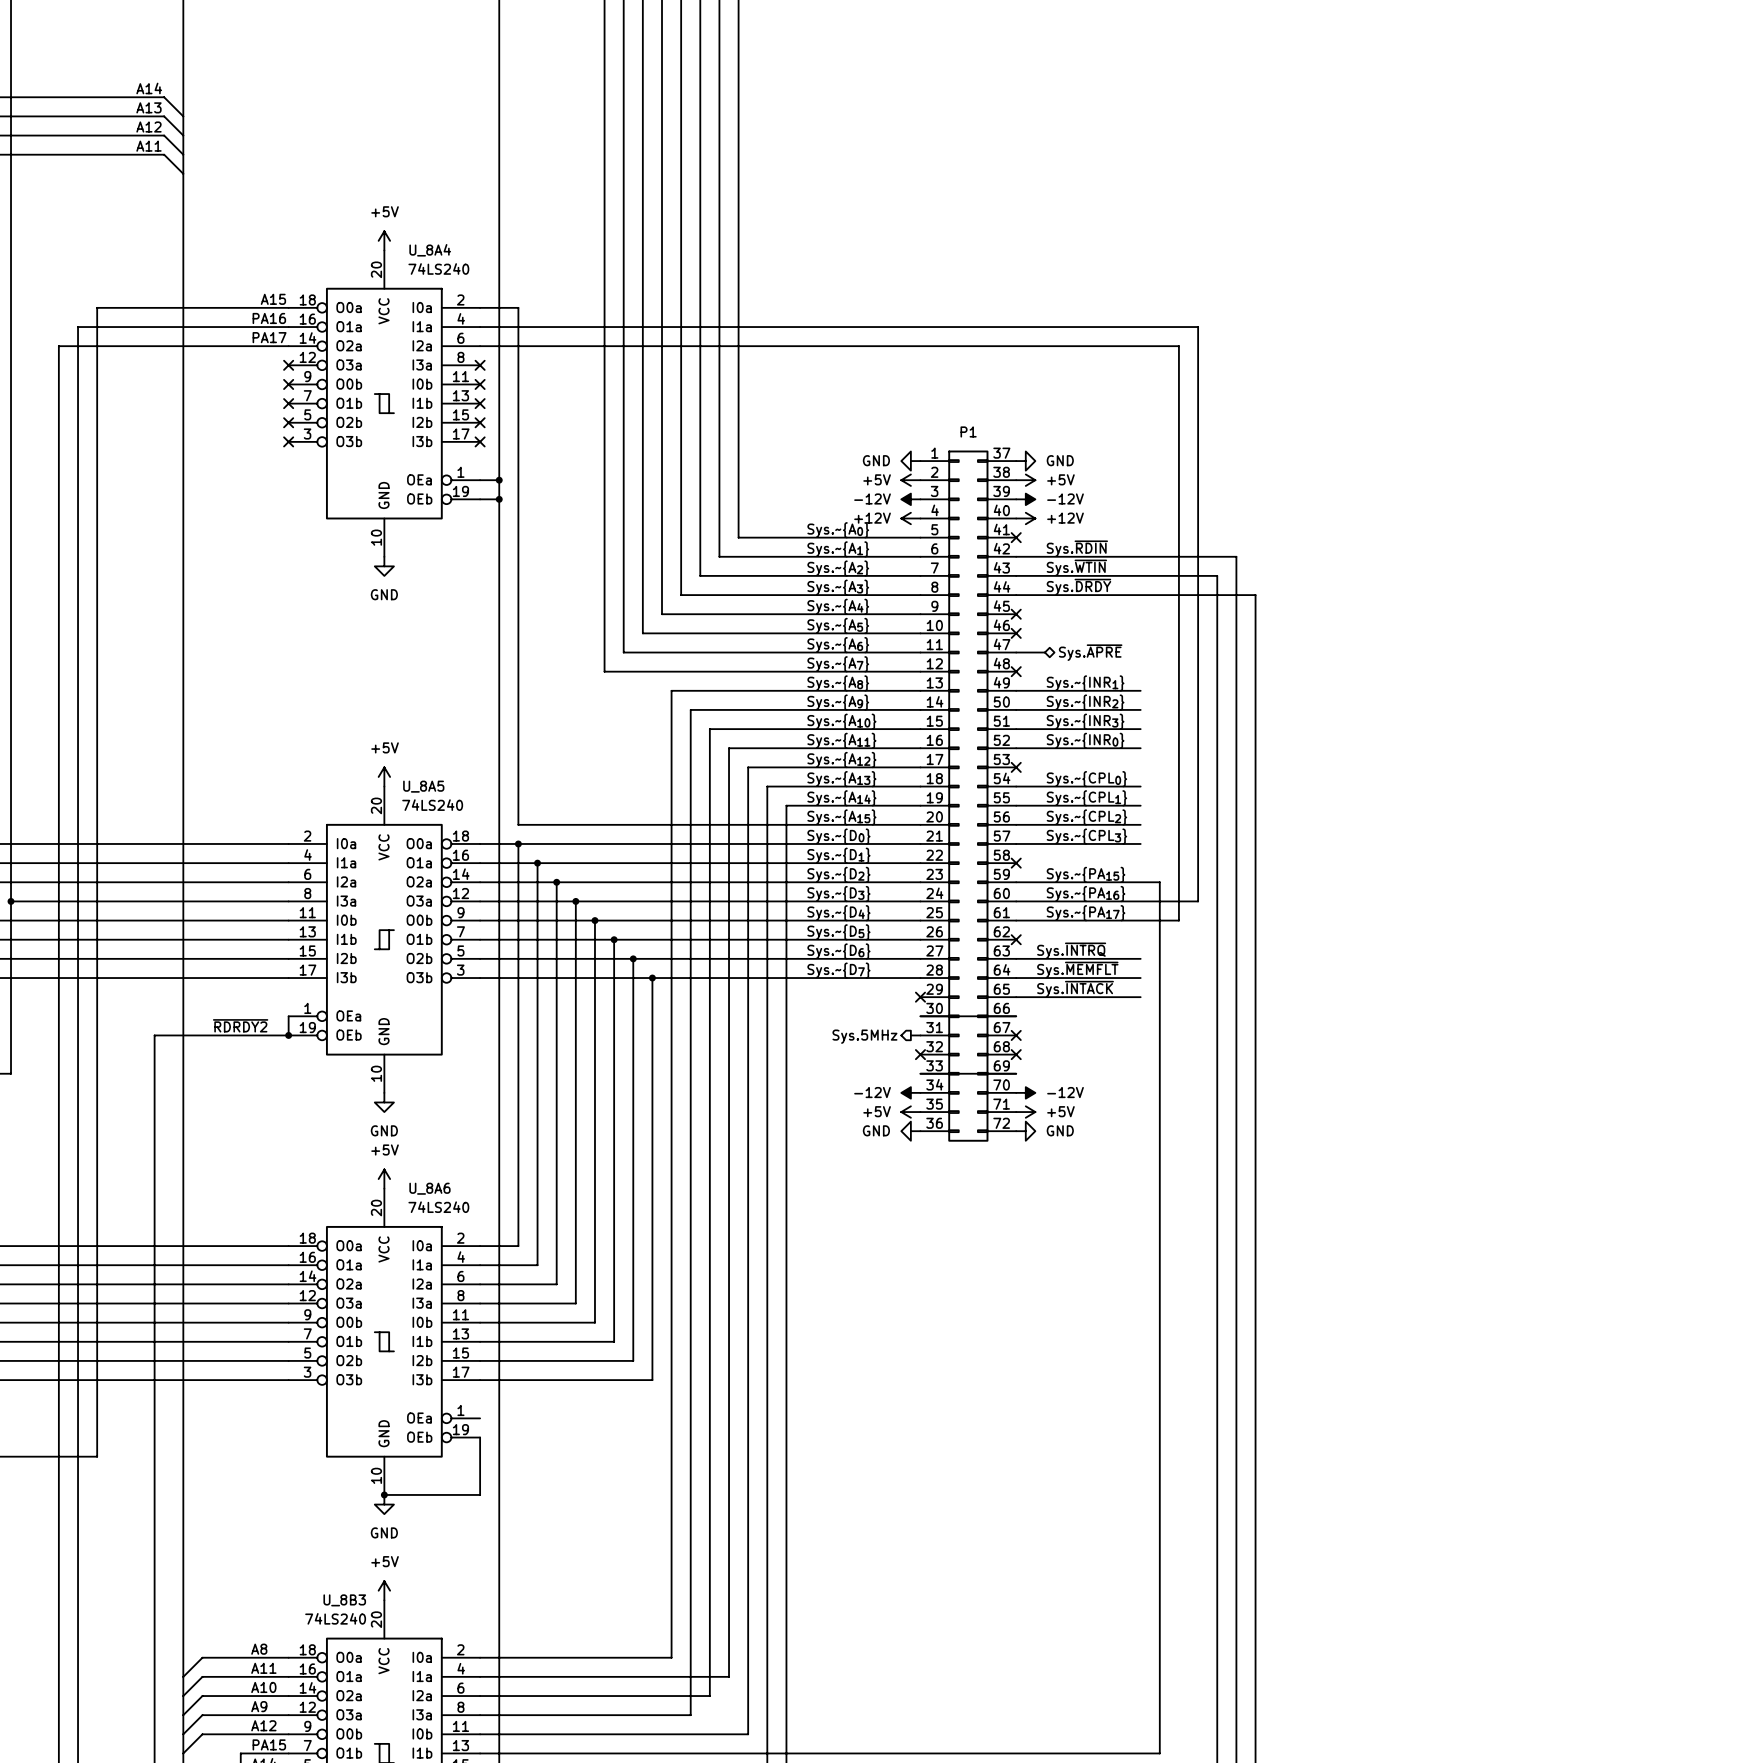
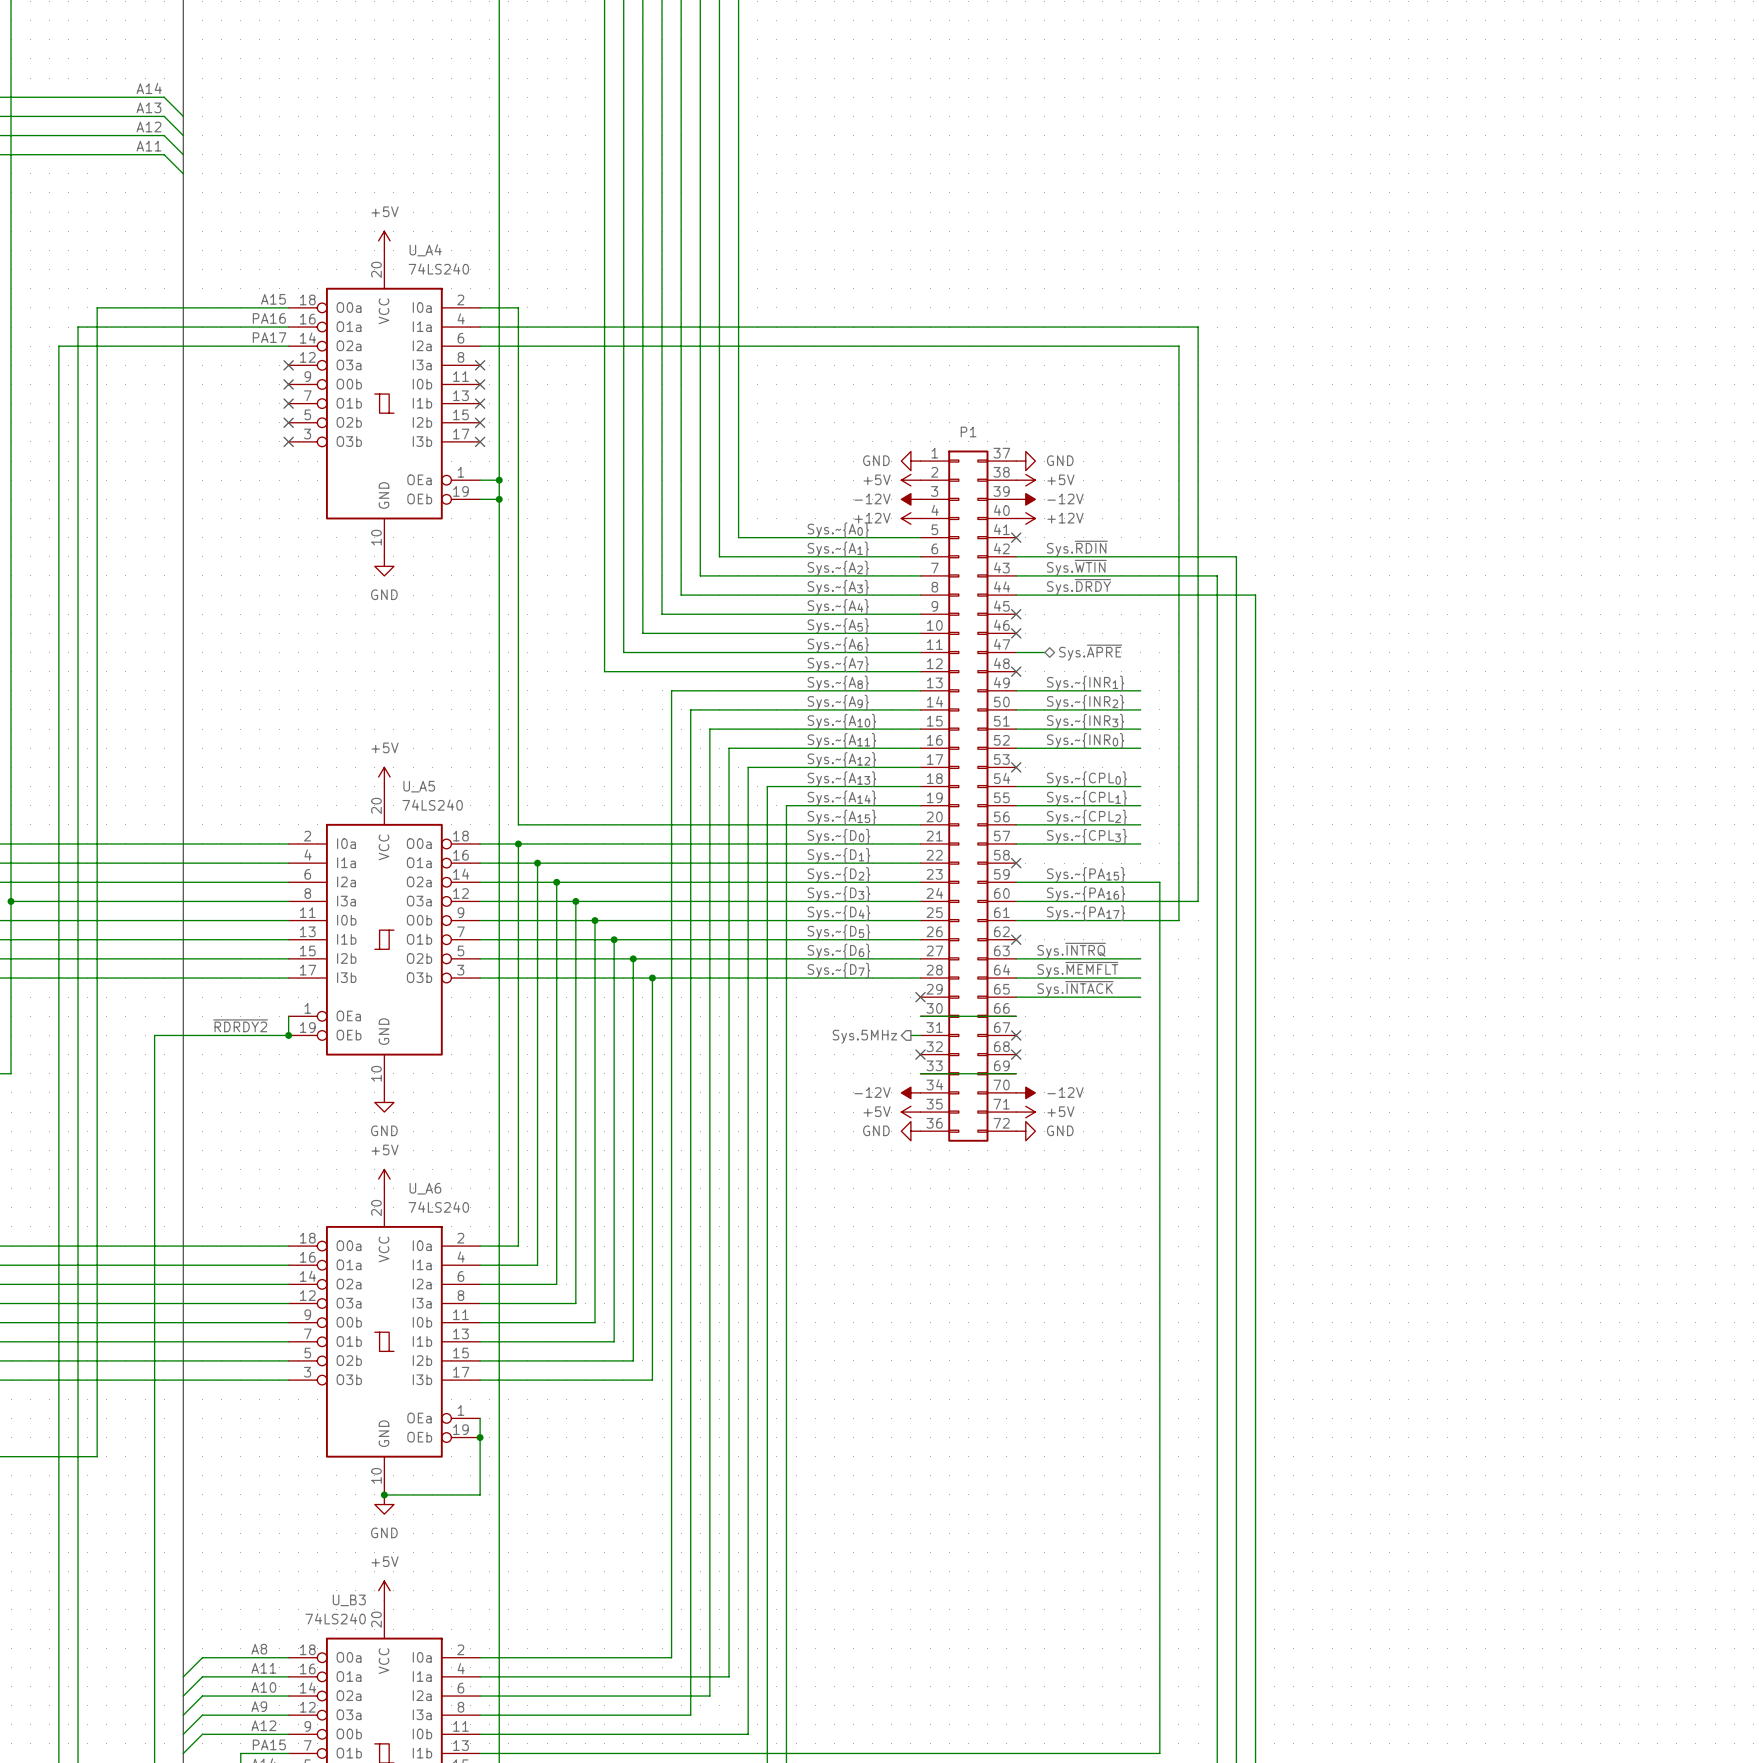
U_8A4 name: U_8A4 (430, 250) -> U_A4 (425, 250)
U_8A5 name: U_8A5 (423, 786) -> U_A5 (419, 786)
U_8A6 name: U_8A6 (429, 1188) -> U_A6 (425, 1188)
wire: none -> (480, 1418) (480, 1437)
junction: none -> (480, 1437)
U_8B3 name: U_8B3 (344, 1600) -> U_B3 (349, 1600)

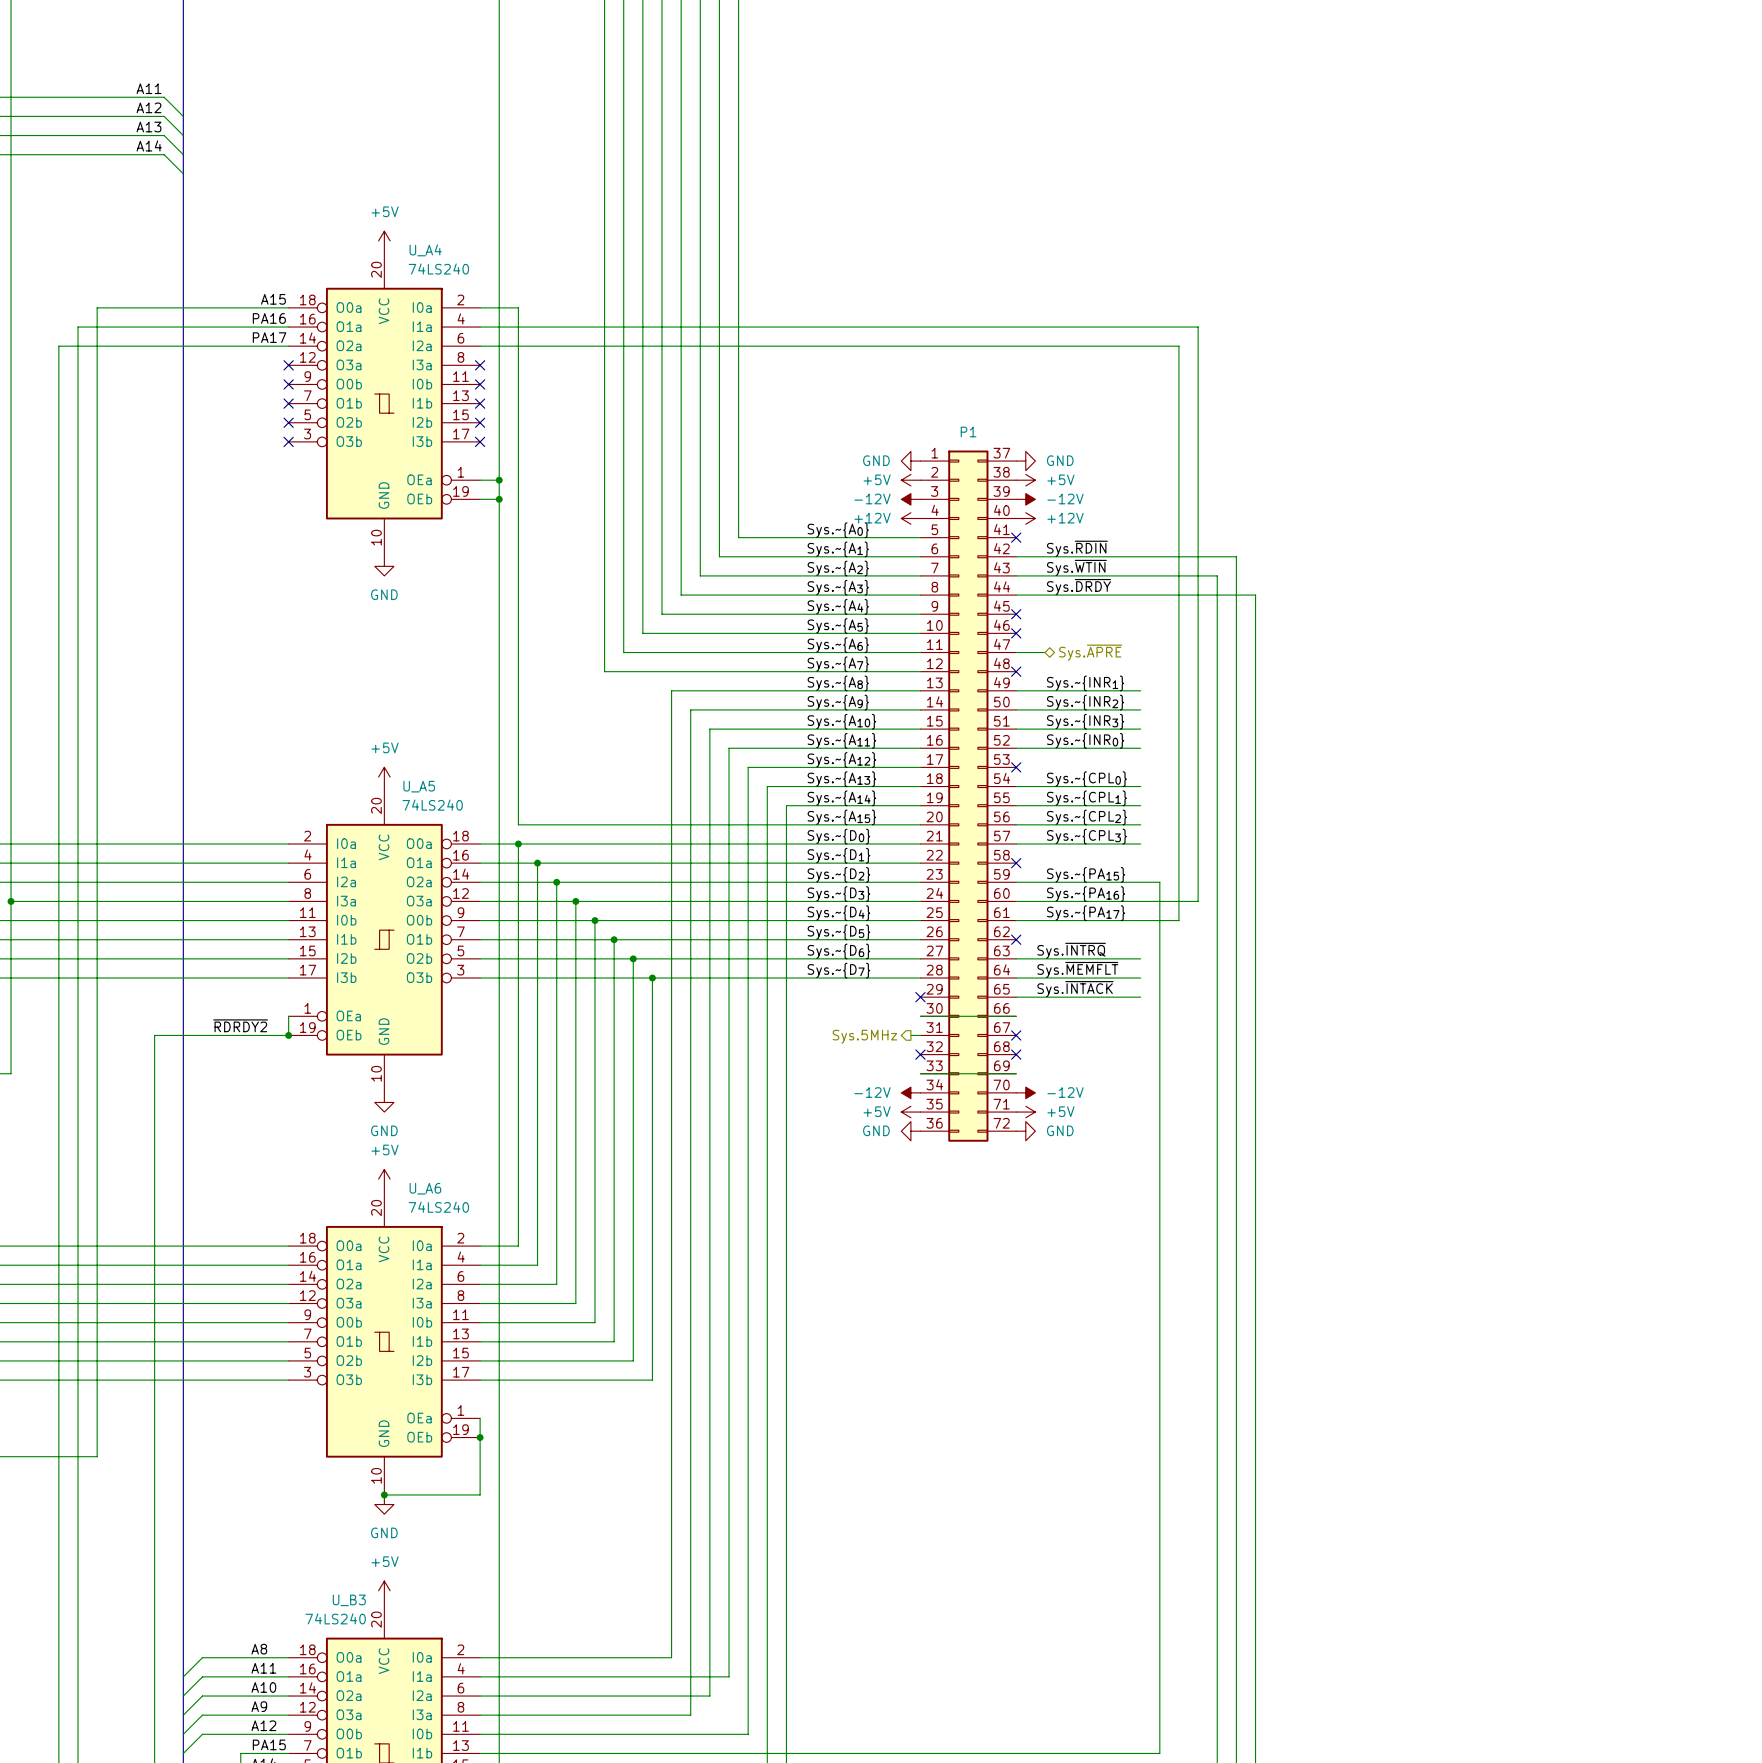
label: A14 (149, 88) -> A11 (148, 88)
label: A13 (148, 107) -> A12 (148, 107)
label: A12 (148, 127) -> A13 (148, 127)
label: A11 (148, 146) -> A14 (149, 145)

